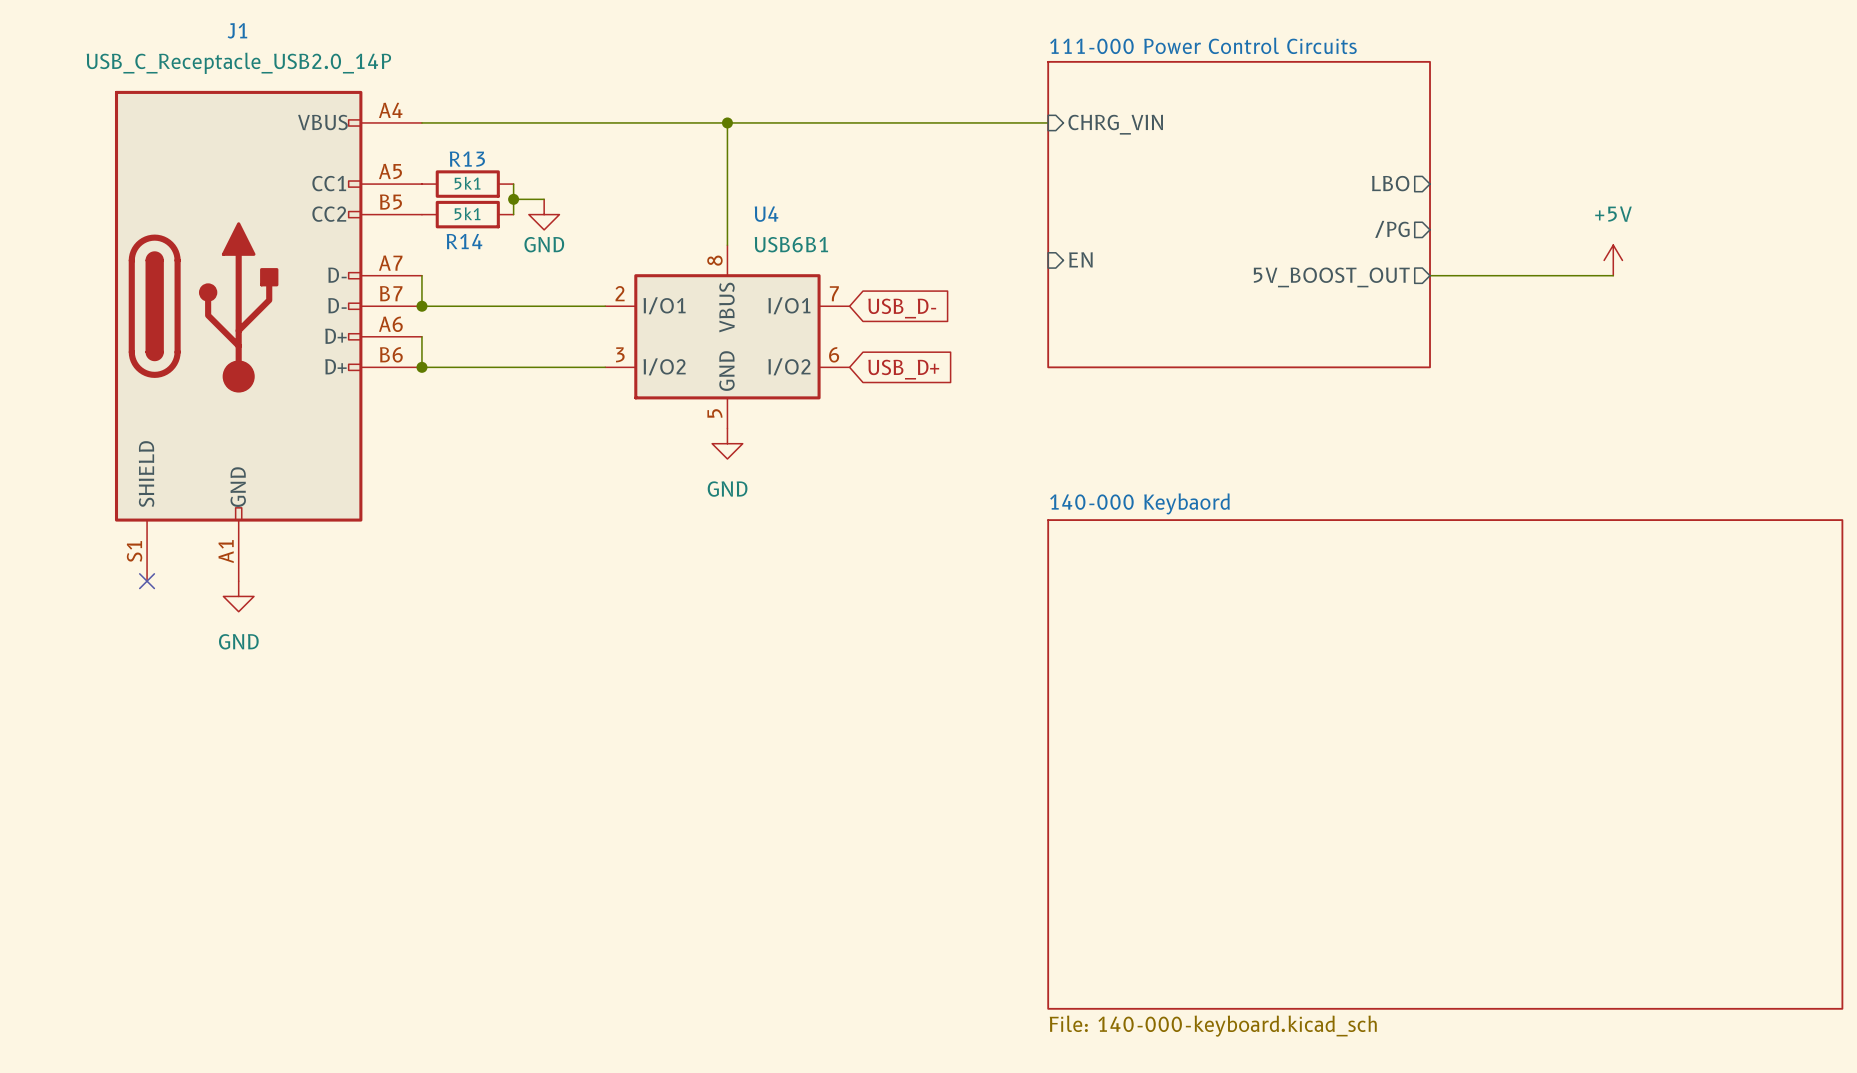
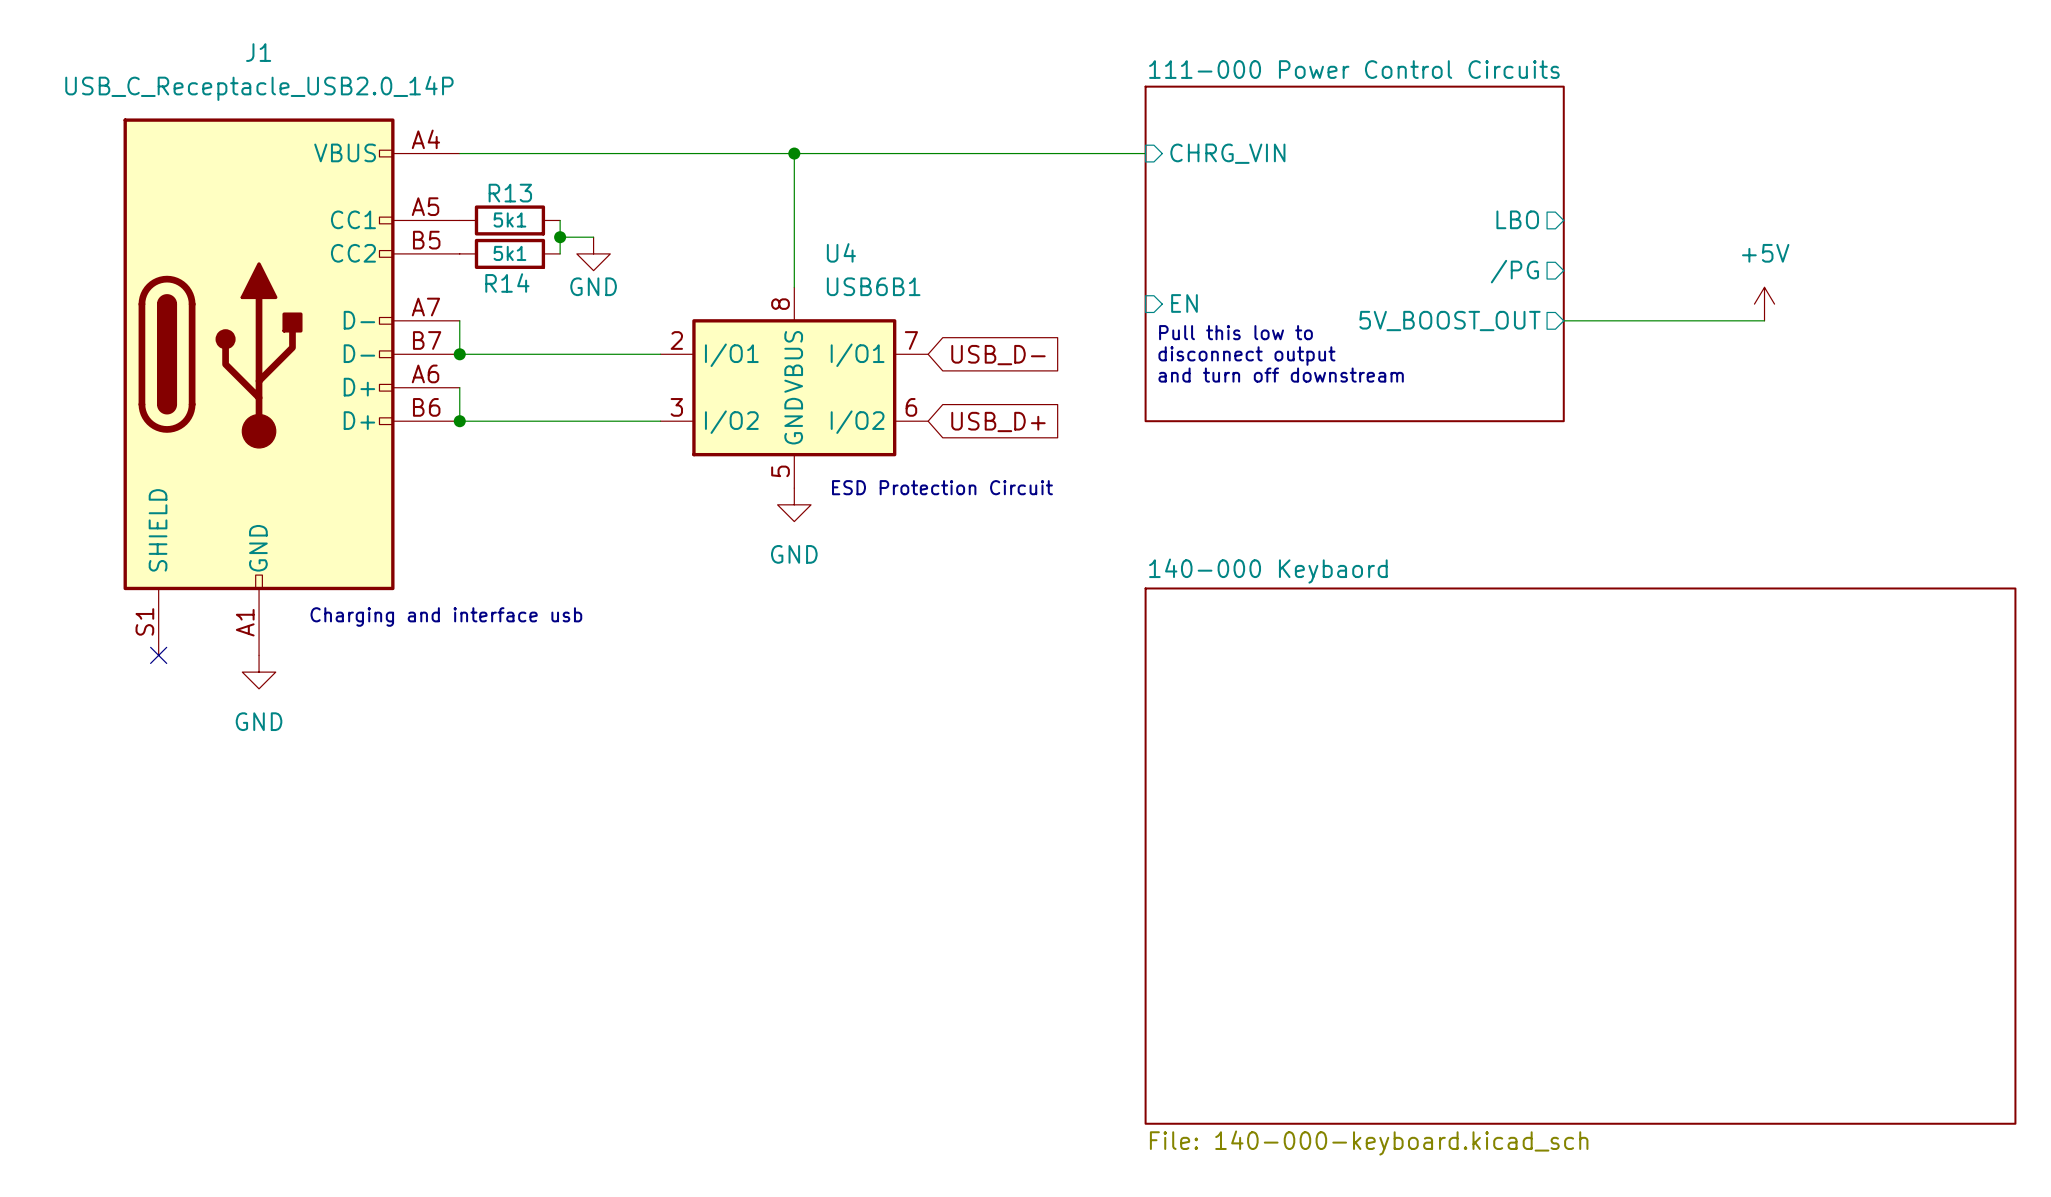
text: none -> Pull this low to (1235, 332)
text: none -> disconnect output (1246, 356)
text: none -> and turn off downstream (1281, 375)
text: none -> ESD Protection Circuit (942, 487)
text: none -> Charging and interface usb (446, 616)

